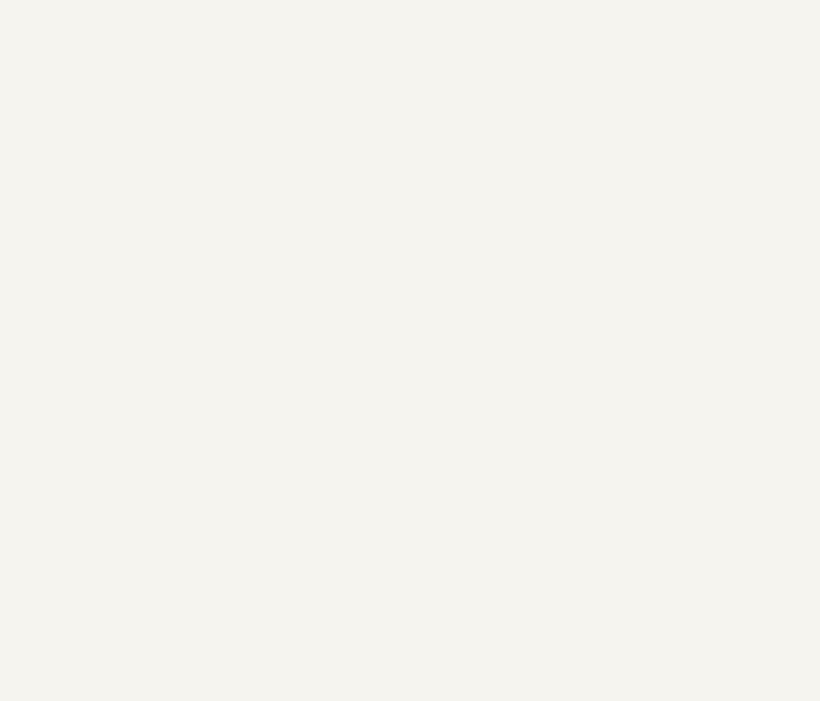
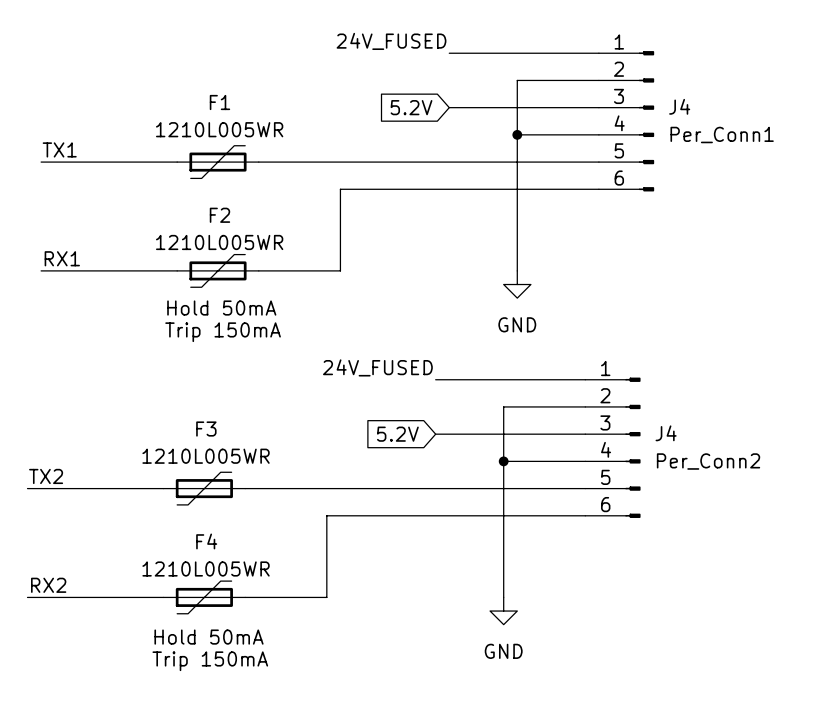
label: none -> 24V_FUSED (391, 41)
wire: none -> (449, 53) (598, 53)
wire: none -> (598, 80) (517, 80) (517, 270)
global label: none -> 5.2V (411, 107)
wire: none -> (449, 107) (598, 107)
J4: none -> Per_Conn1 (626, 121)
wire: none -> (517, 134) (598, 134)
junction: none -> (517, 134)
label: none -> TX1 (59, 149)
wire: none -> (41, 162) (177, 162)
F1: none -> 1210L005WR (217, 162)
wire: none -> (258, 162) (598, 162)
wire: none -> (598, 189) (340, 189) (340, 270) (258, 270)
label: none -> RX1 (62, 258)
wire: none -> (41, 270) (177, 270)
F2: none -> 1210L005WR (217, 270)
power symbol: none -> GND (517, 284)
text: none -> Hold 50mA (221, 308)
text: none -> Trip 150mA (223, 332)
label: none -> 24V_FUSED (377, 367)
wire: none -> (435, 379) (585, 379)
wire: none -> (585, 406) (503, 406) (503, 597)
global label: none -> 5.2V (397, 434)
wire: none -> (435, 434) (585, 434)
J4: none -> Per_Conn2 (612, 447)
wire: none -> (503, 461) (585, 461)
junction: none -> (503, 461)
label: none -> TX2 (46, 476)
wire: none -> (27, 488) (163, 488)
F3: none -> 1210L005WR (204, 488)
wire: none -> (245, 488) (585, 488)
wire: none -> (585, 515) (326, 515) (326, 597) (245, 597)
label: none -> RX2 (48, 585)
wire: none -> (27, 597) (163, 597)
F4: none -> 1210L005WR (204, 597)
power symbol: none -> GND (503, 611)
text: none -> Hold 50mA (209, 637)
text: none -> Trip 150mA (210, 661)

